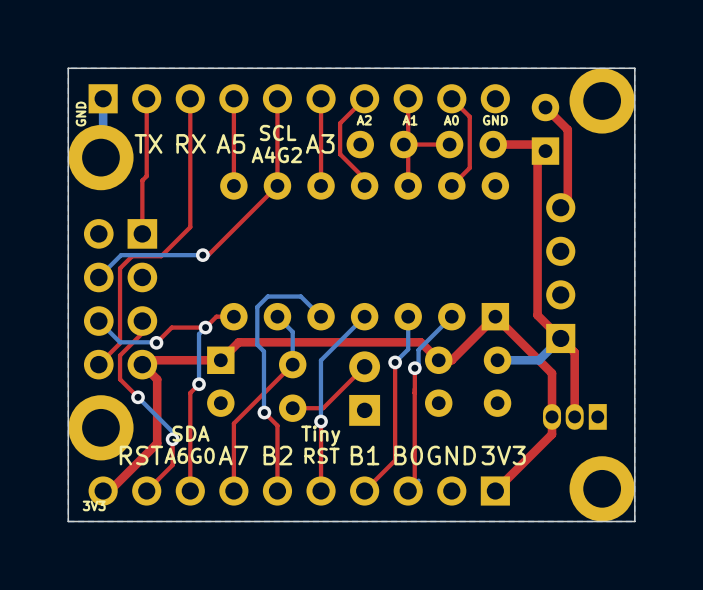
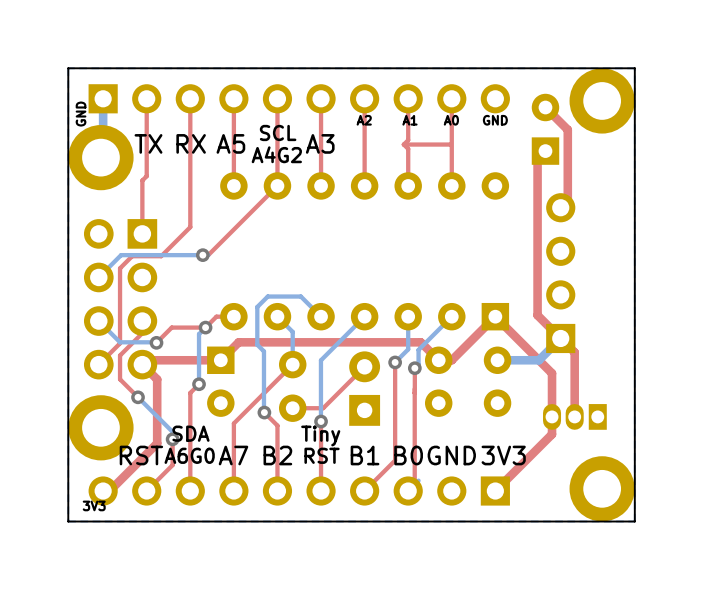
top track: (364, 98) (340, 123) (340, 154) (364, 178) -> (364, 98) (364, 178)
top track: (451, 98) (469, 116) (469, 167) (451, 185) -> (451, 98) (451, 185)
part: (382, 144) -> none
part: (471, 144) -> none
top track: (493, 144) (538, 144) (545, 151) -> none

